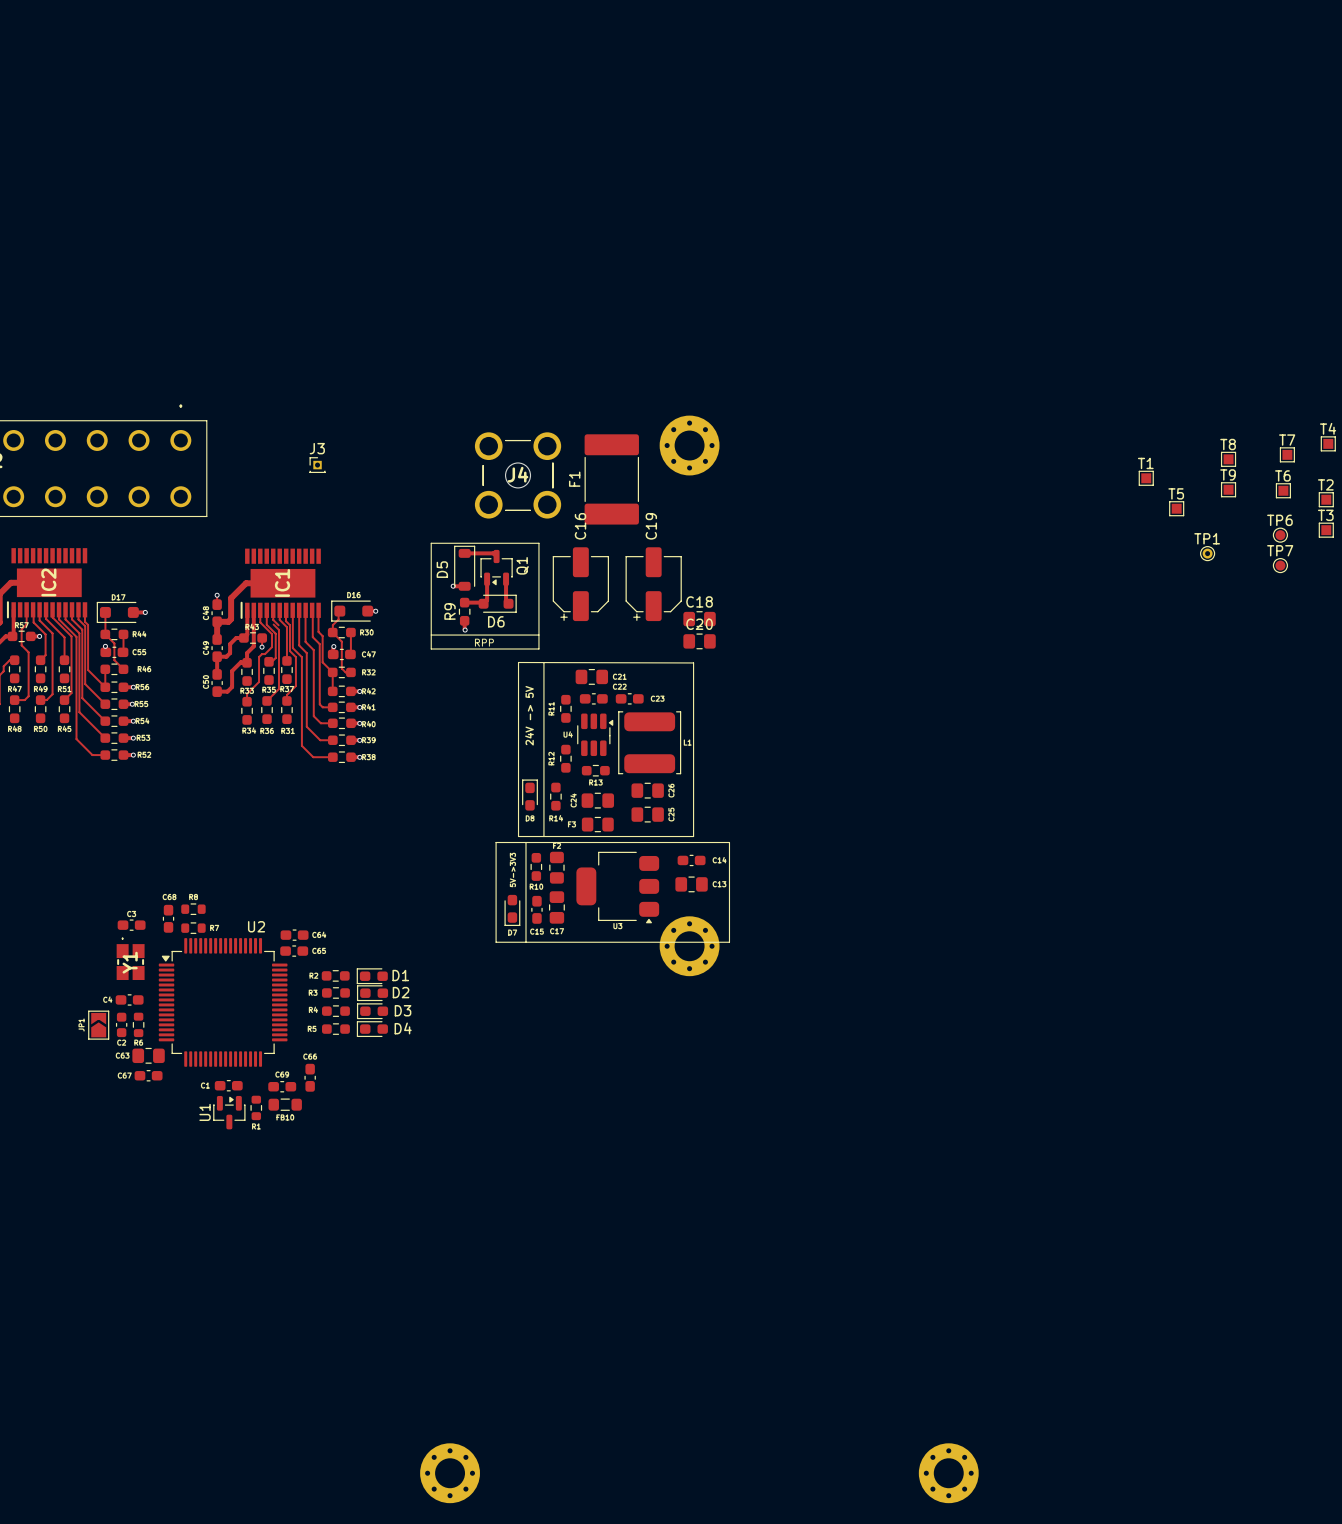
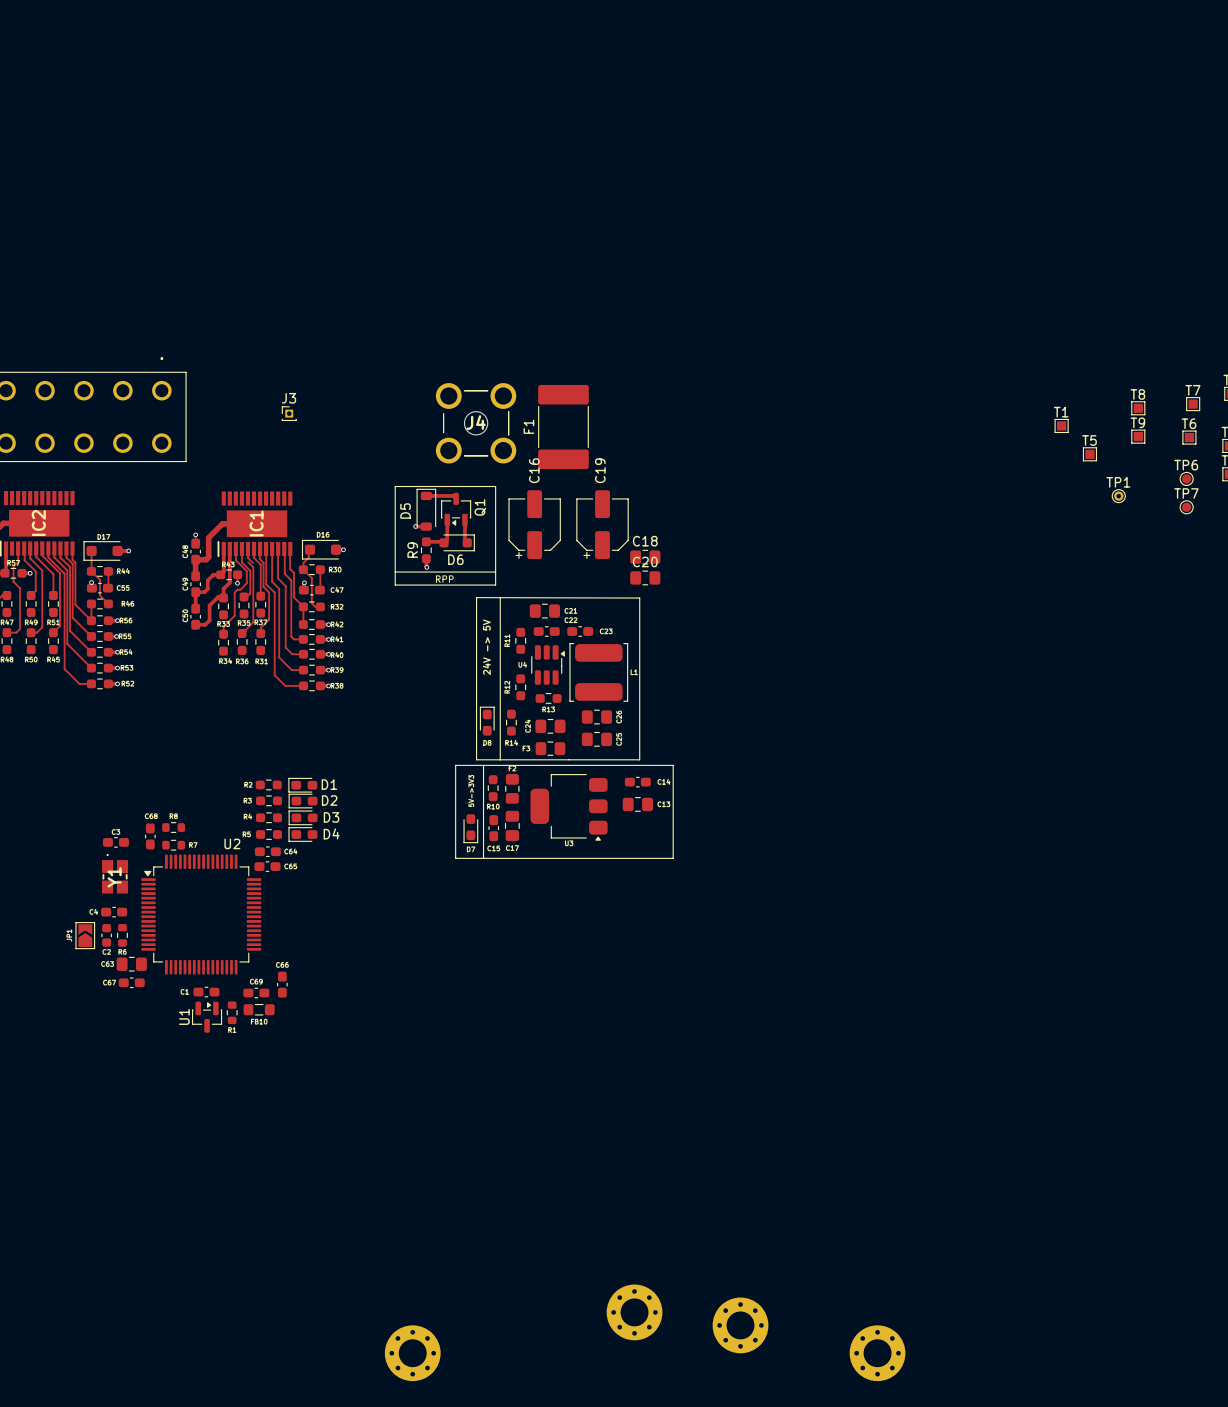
part: (689, 445) -> none
part: (689, 946) -> none
part position: (335, 975) -> (268, 784)
D1 position: (372, 976) -> (302, 785)
part position: (335, 992) -> (269, 800)
D2 position: (372, 993) -> (303, 801)
part position: (335, 1011) -> (269, 817)
D3 position: (372, 1011) -> (303, 817)
part position: (335, 1029) -> (269, 834)
D4 position: (372, 1029) -> (302, 834)
part: none -> (634, 1312)
part: none -> (740, 1325)

